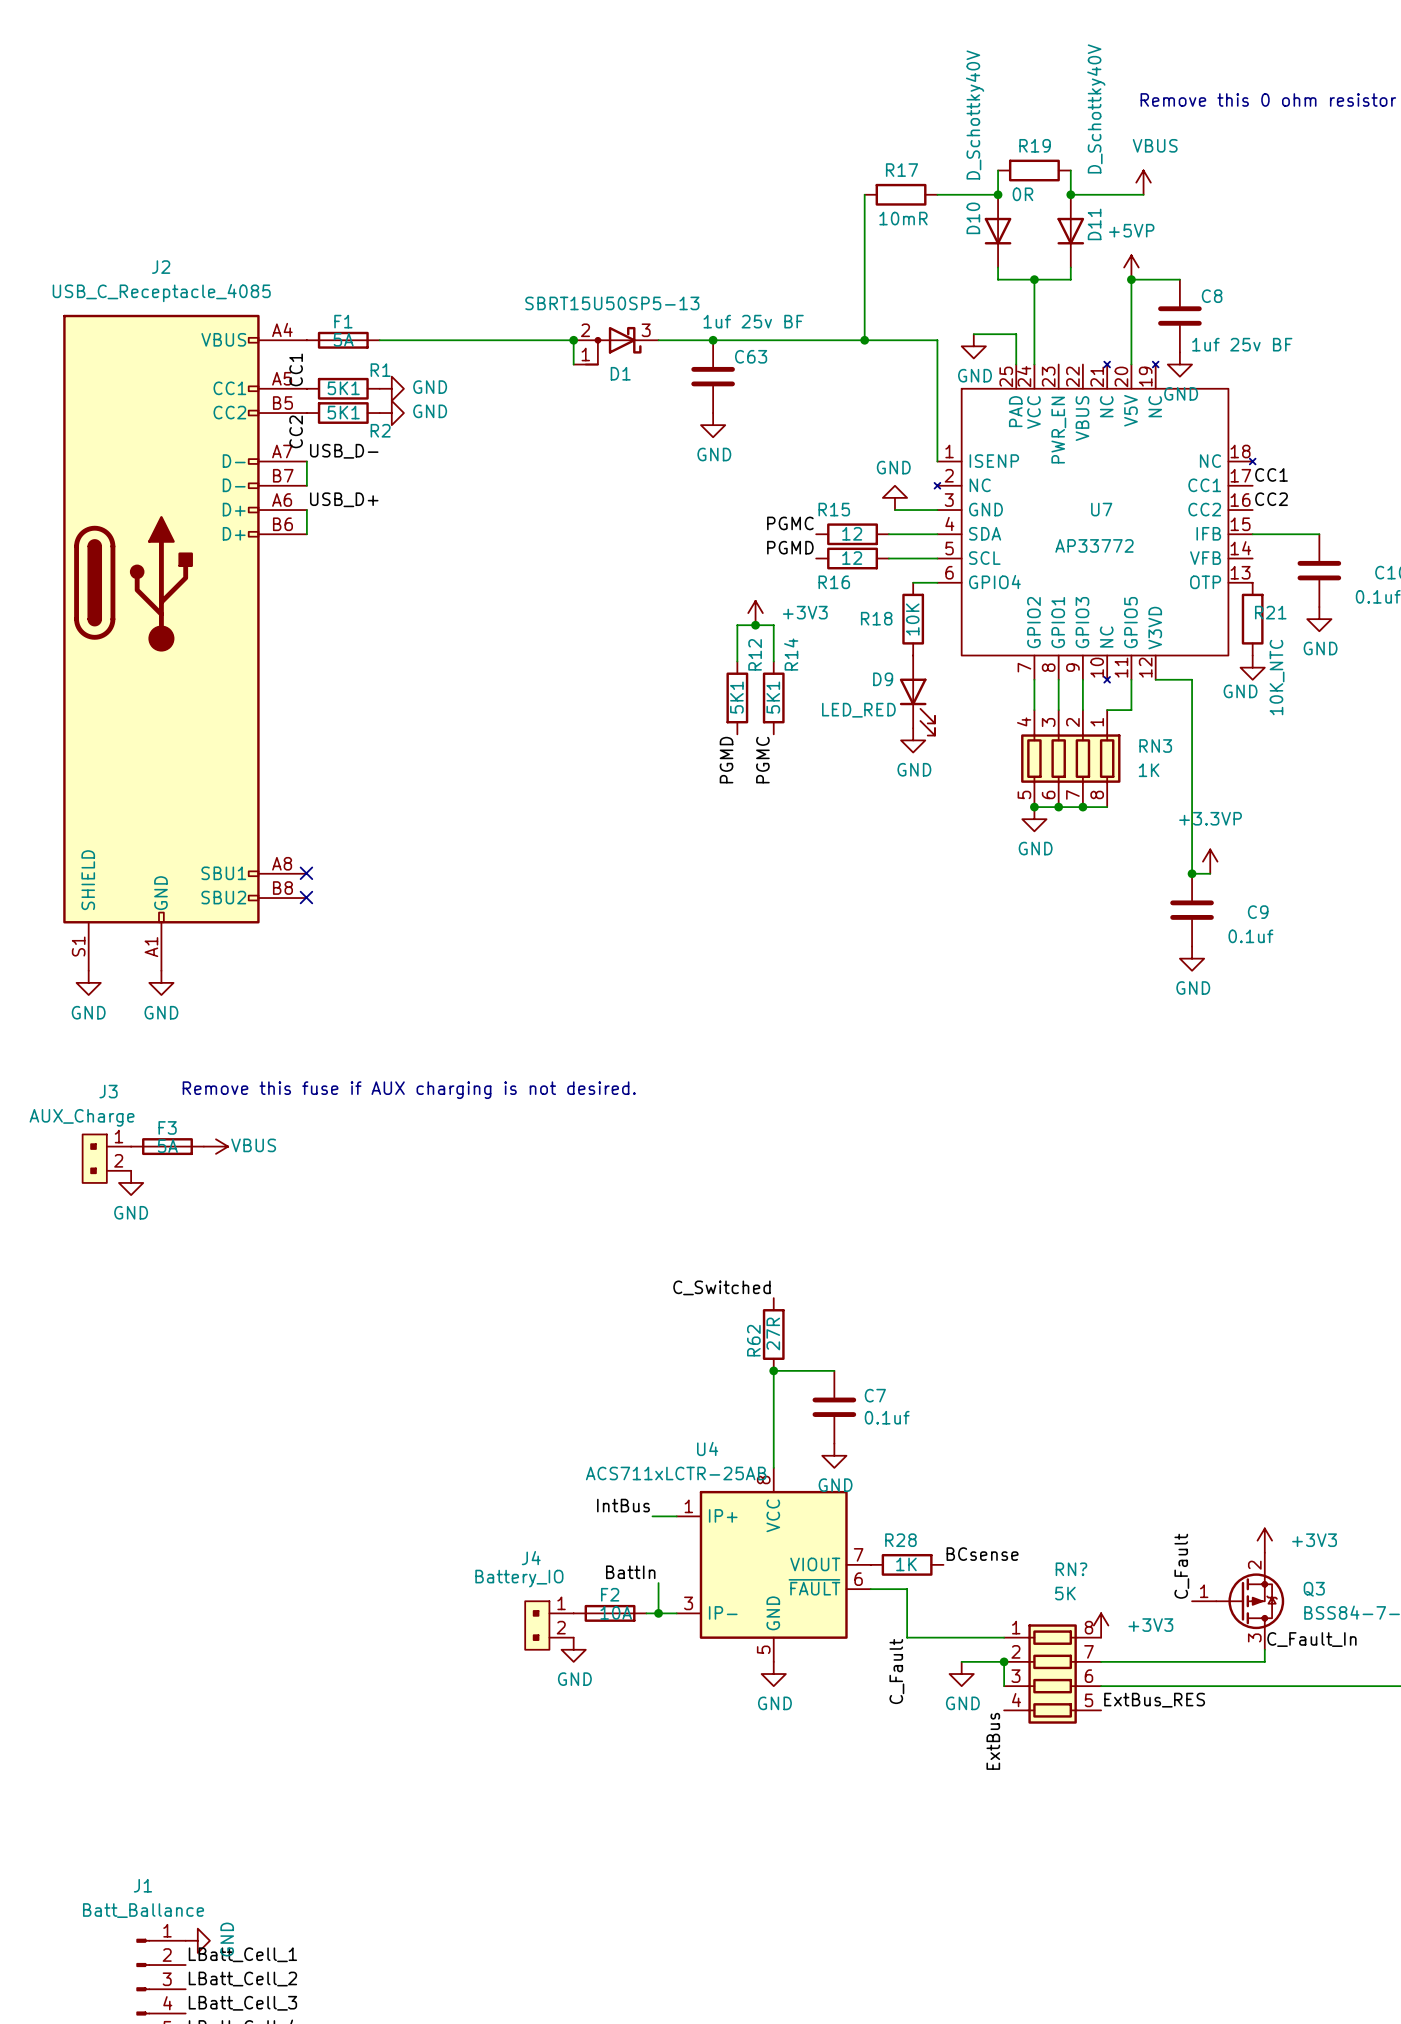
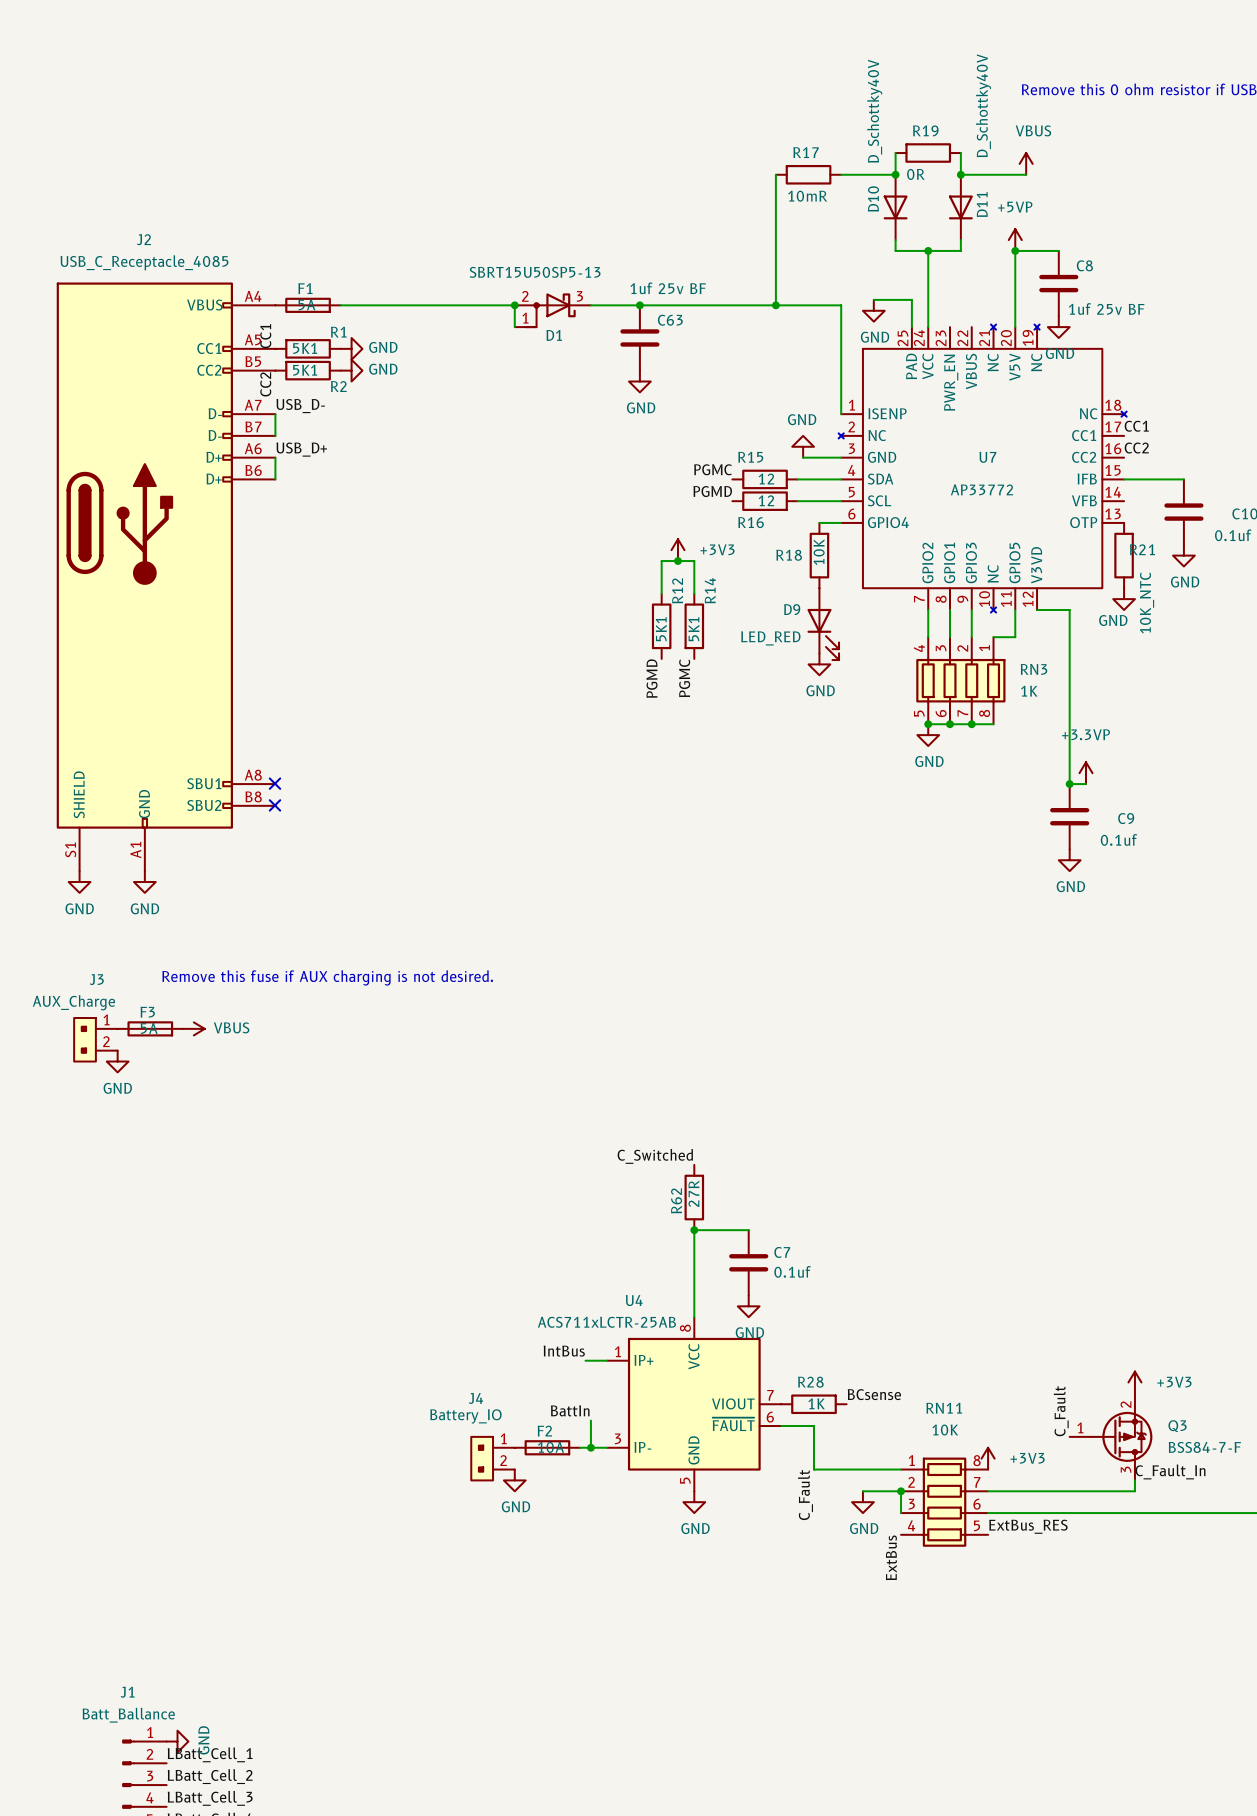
RN? name: RN? (1071, 1569) -> RN11 (944, 1408)
RN? value: 5K (1065, 1593) -> 10K (945, 1430)

